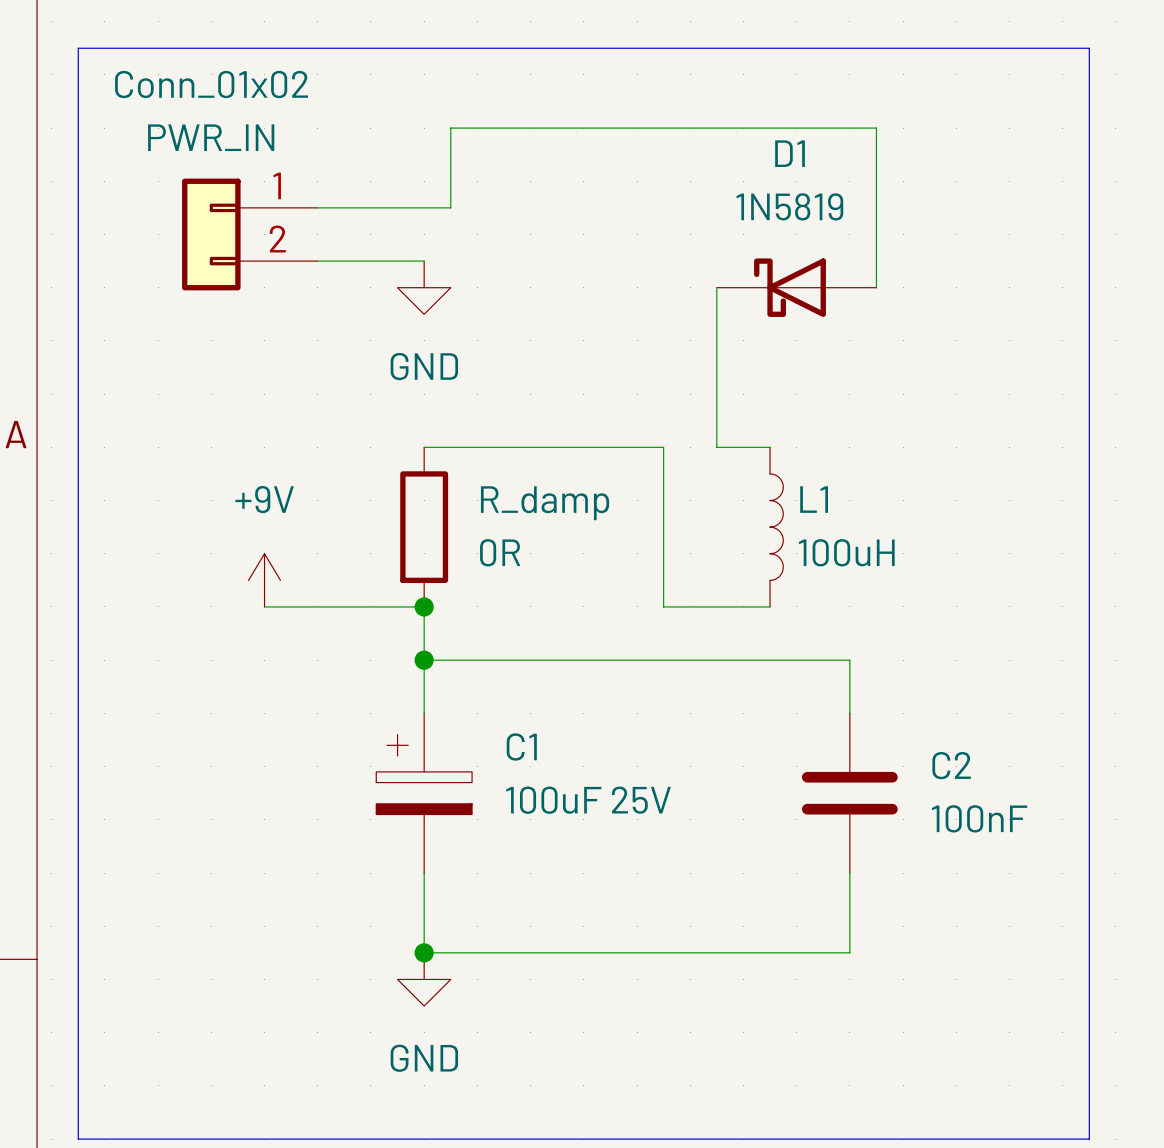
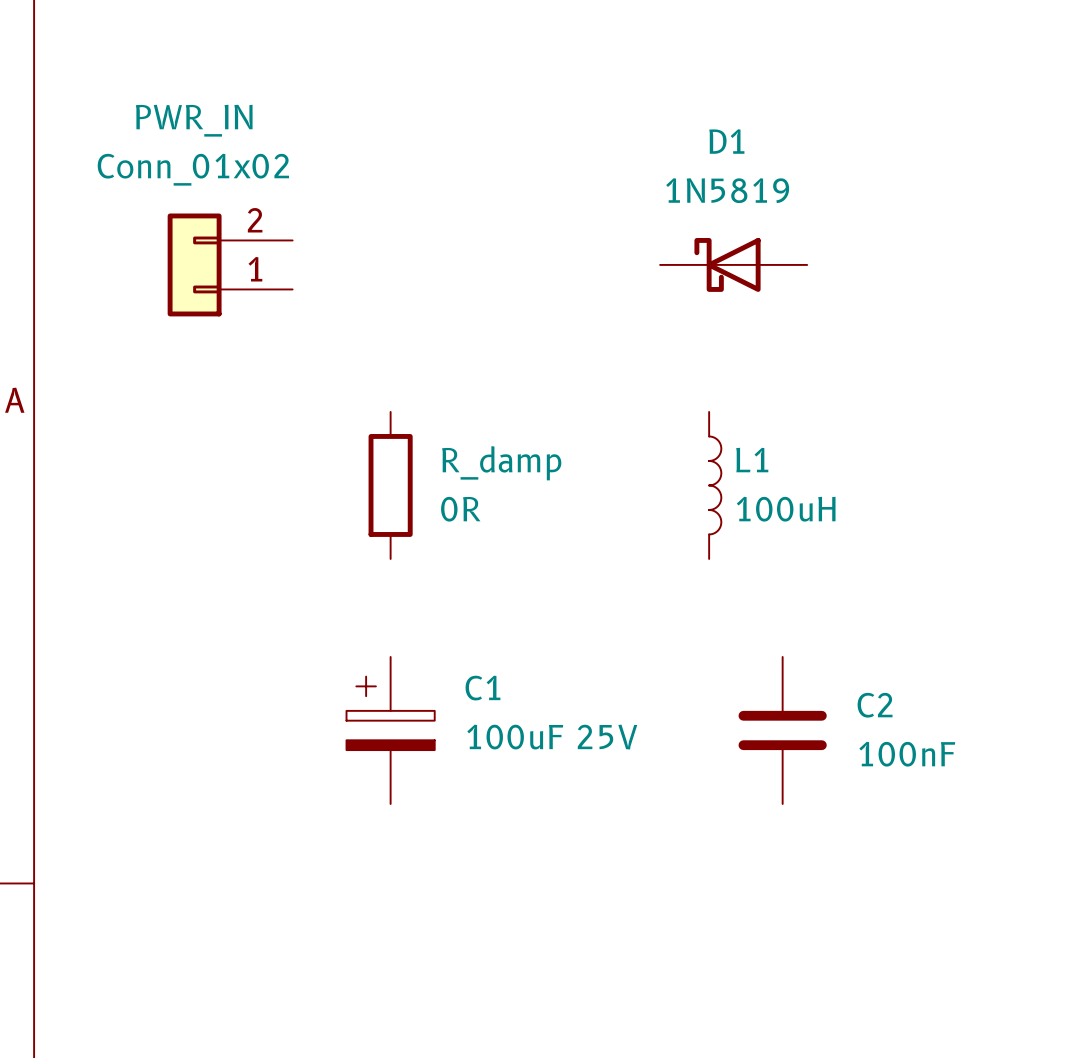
line: (78, 48) (1089, 48) (1089, 1139) (78, 1139) (78, 48) -> none
wire: (317, 207) (450, 207) (450, 128) (876, 128) (876, 287) -> none
PWR_IN: Conn_01x02 (249, 234) -> none
wire: (317, 261) (424, 261) -> none
PWR_IN: none -> Conn_01x02 (230, 264)
power symbol: GND (424, 287) -> none
wire: (716, 287) (716, 447) (770, 447) -> none
wire: (424, 447) (663, 447) (663, 606) (770, 606) -> none
power symbol: +9V (264, 580) -> none
wire: (264, 606) (424, 606) (424, 713) -> none
junction: (424, 606) -> none
wire: (424, 660) (849, 660) (849, 713) -> none
junction: (424, 660) -> none
wire: (424, 873) (424, 952) (849, 952) (849, 873) -> none
junction: (424, 952) -> none
power symbol: GND (424, 979) -> none

